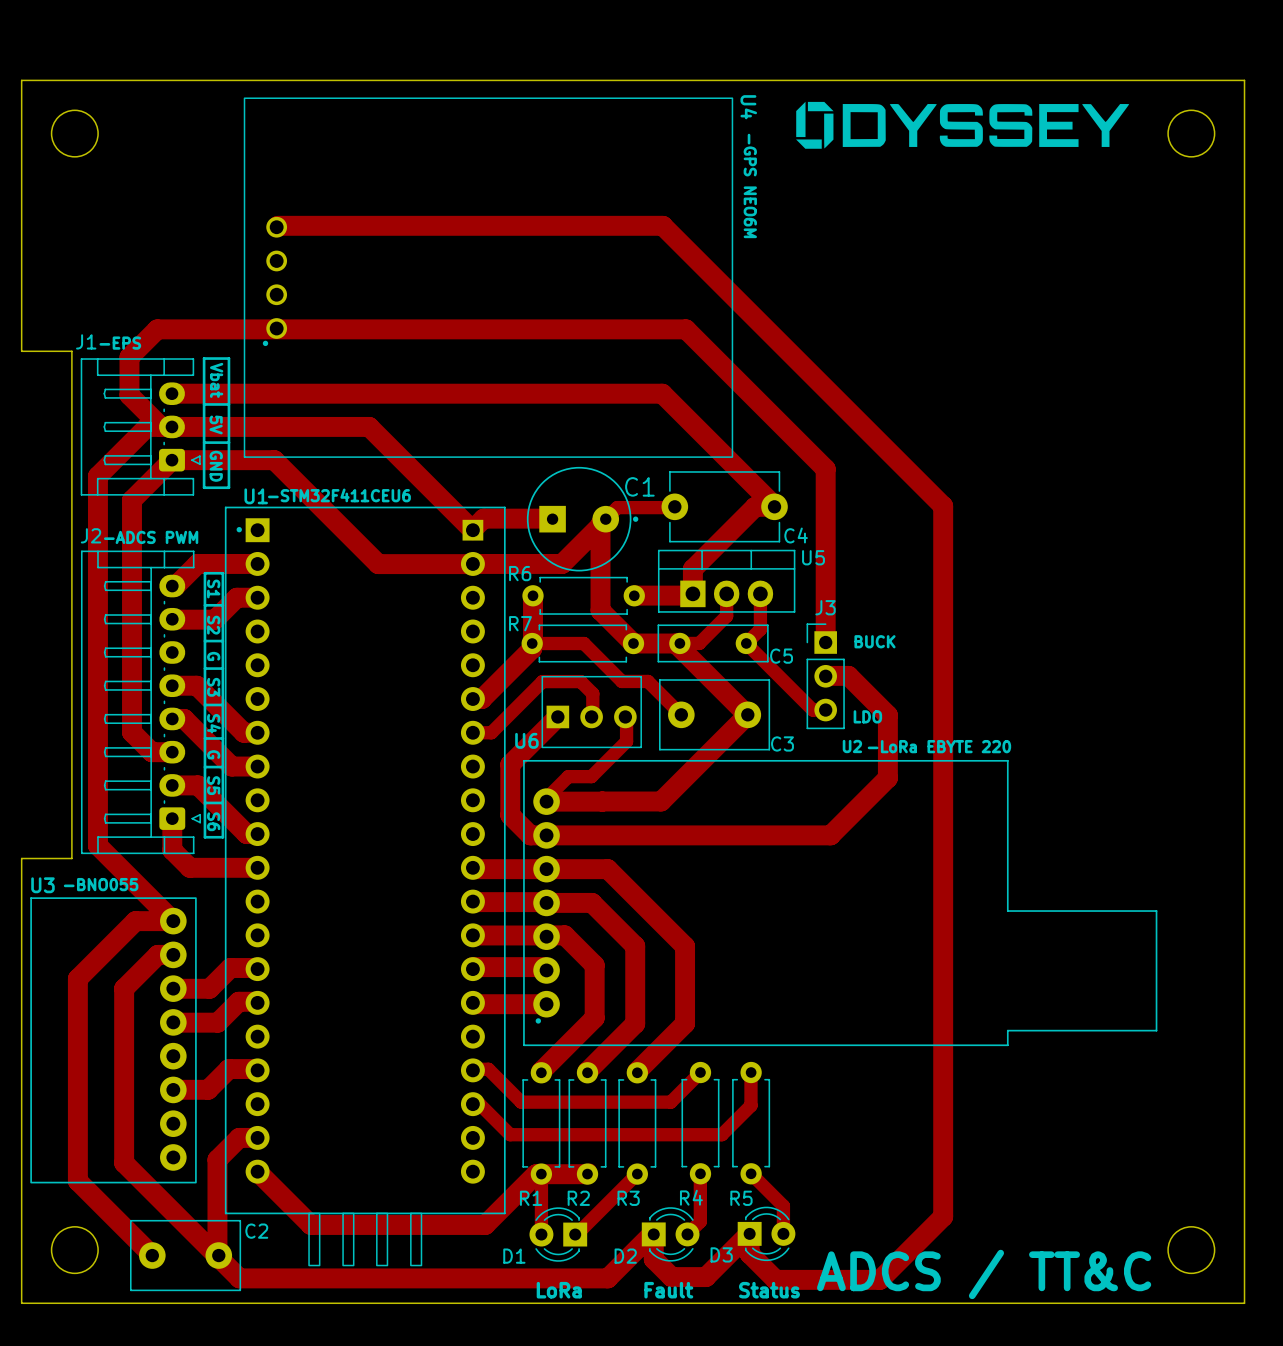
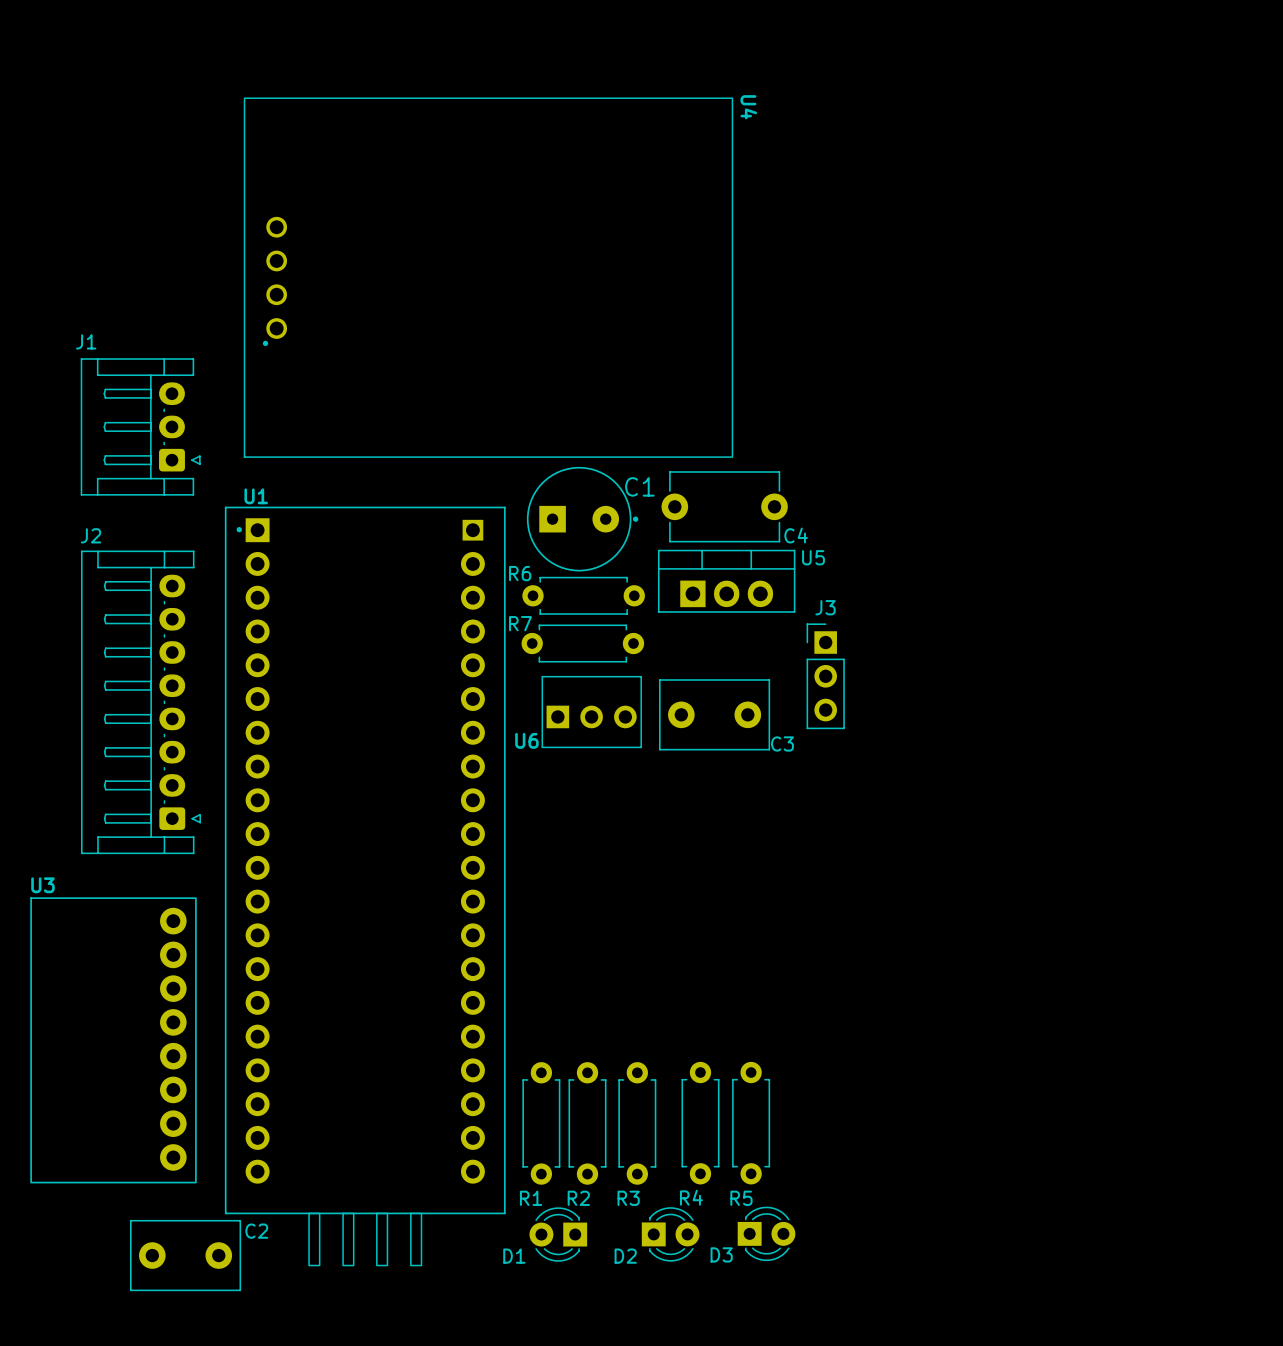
board edge: (21, 80) (1244, 80) (1244, 1303) (21, 1303) (21, 858) (71, 858) (71, 351) (21, 351) (21, 80) -> none
drawing: [796, 101, 1130, 149] -> none
round board edge: [51, 109, 99, 158] -> none
round board edge: [1167, 109, 1215, 158] -> none
text: -GPS NEO6M (750, 185) -> none
track: (276, 227) (662, 225) (943, 506) (943, 1216) (880, 1279) (775, 1279) (749, 1253) (749, 1233) -> none
text: -EPS (120, 343) -> none
line: (204, 358) (228, 358) (228, 487) (204, 487) (204, 358) -> none
text: Vbat (216, 380) -> none
track: (171, 393) (662, 393) (774, 506) (755, 506) (692, 569) (692, 593) (691, 595) (634, 595) -> none
line: (204, 404) (228, 404) -> none
text: 5V (216, 424) -> none
track: (161, 426) (129, 395) (129, 357) (157, 329) (685, 329) (825, 469) (825, 642) -> none
line: (204, 442) (229, 442) -> none
text: GND (216, 466) -> none
text: -STM32F411CEU6 (339, 495) -> none
track: (674, 506) (617, 507) (605, 519) -> none
track: (552, 519) (483, 518) (472, 529) -> none
track: (605, 519) (562, 563) (472, 563) -> none
track: (605, 519) (600, 524) (600, 610) (633, 643) (675, 643) (747, 714) -> none
track: (472, 530) (369, 426) (147, 426) (97, 476) (97, 845) (173, 921) (135, 921) (77, 978) (77, 1181) (152, 1255) -> none
text: -ADCS PWM (151, 537) -> none
track: (257, 563) (197, 563) (175, 586) (172, 586) -> none
track: (472, 564) (378, 564) (274, 460) (171, 460) (131, 500) (131, 732) (151, 752) (172, 752) -> none
line: (204, 573) (222, 573) (222, 837) (204, 837) (204, 573) -> none
text: S1 (213, 589) -> none
track: (726, 593) (726, 616) (699, 643) (679, 643) -> none
track: (760, 593) (760, 629) (746, 643) -> none
track: (257, 597) (236, 597) (214, 619) (172, 619) -> none
track: (533, 599) (533, 642) -> none
line: (204, 605) (222, 605) -> none
text: S2 (213, 625) -> none
line: (204, 641) (222, 641) -> none
text: BUCK (875, 641) -> none
C5: (713, 643) -> none
track: (746, 643) (812, 710) (825, 710) -> none
text: G (213, 656) -> none
line: (204, 668) (222, 668) -> none
track: (825, 676) (848, 675) (887, 715) (887, 778) (830, 835) (530, 835) (510, 815) (510, 764) (557, 716) -> none
track: (184, 685) (172, 685) (196, 685) (243, 732) (257, 732) -> none
text: S3 (213, 687) -> none
track: (479, 699) (472, 699) (481, 699) (532, 648) (532, 643) (583, 643) (621, 681) (647, 681) (683, 716) -> none
line: (204, 704) (222, 704) -> none
track: (747, 714) (661, 801) (602, 801) -> none
track: (591, 716) (592, 693) (580, 681) (542, 681) (491, 732) (472, 732) -> none
track: (625, 716) (626, 741) (591, 776) (568, 776) (546, 798) (546, 801) (602, 801) -> none
text: LDO (867, 716) -> none
track: (172, 718) (184, 718) (231, 766) (257, 766) -> none
text: S4 (213, 723) -> none
line: (204, 738) (222, 738) -> none
text: U2 (852, 746) -> none
text: -LoRa EBYTE 220 (939, 746) -> none
text: G (213, 754) -> none
line: (204, 767) (222, 767) -> none
track: (172, 785) (198, 785) (246, 834) (257, 834) -> none
text: S5 (213, 785) -> none
line: (204, 802) (222, 802) -> none
track: (172, 818) (172, 850) (189, 867) (257, 867) -> none
text: S6 (213, 821) -> none
track: (472, 867) (607, 869) (685, 946) (685, 1023) (637, 1072) -> none
text: -BNO055 (101, 884) -> none
track: (471, 900) (473, 902) (545, 902) -> none
track: (546, 902) (592, 902) (635, 946) (635, 1023) (587, 1071) (587, 1072) (589, 1070) (589, 1068) -> none
part: (840, 903) -> none
track: (473, 935) (546, 936) -> none
track: (546, 935) (564, 935) (594, 965) (594, 1018) (541, 1072) -> none
track: (173, 954) (157, 954) (124, 988) (124, 1163) (239, 1278) (607, 1278) (651, 1234) (653, 1234) (653, 1259) (671, 1277) (705, 1277) (749, 1233) -> none
track: (256, 968) (230, 968) (209, 988) (175, 988) -> none
track: (471, 968) (543, 967) (546, 970) -> none
track: (256, 1001) (238, 1001) (217, 1022) (175, 1023) -> none
track: (471, 1001) (474, 1004) (546, 1004) -> none
track: (257, 1069) (228, 1069) (208, 1089) (176, 1089) -> none
track: (472, 1070) (488, 1069) (521, 1102) (670, 1102) (700, 1072) -> none
track: (750, 1072) (750, 1105) (721, 1134) (510, 1134) (479, 1104) (472, 1104) -> none
track: (257, 1137) (239, 1137) (217, 1159) (218, 1255) -> none
track: (257, 1171) (310, 1224) (485, 1224) (536, 1174) (587, 1174) -> none
track: (700, 1173) (700, 1221) (687, 1234) -> none
track: (751, 1173) (783, 1206) (783, 1233) (778, 1233) -> none
track: (541, 1174) (541, 1234) -> none
track: (637, 1174) (575, 1234) -> none
round board edge: [51, 1226, 99, 1274] -> none
round board edge: [1167, 1226, 1215, 1274] -> none
text: ADCS / TT&C (984, 1274) -> none
text: LoRa (559, 1290) -> none
text: Fault (668, 1290) -> none
text: Status (769, 1290) -> none

